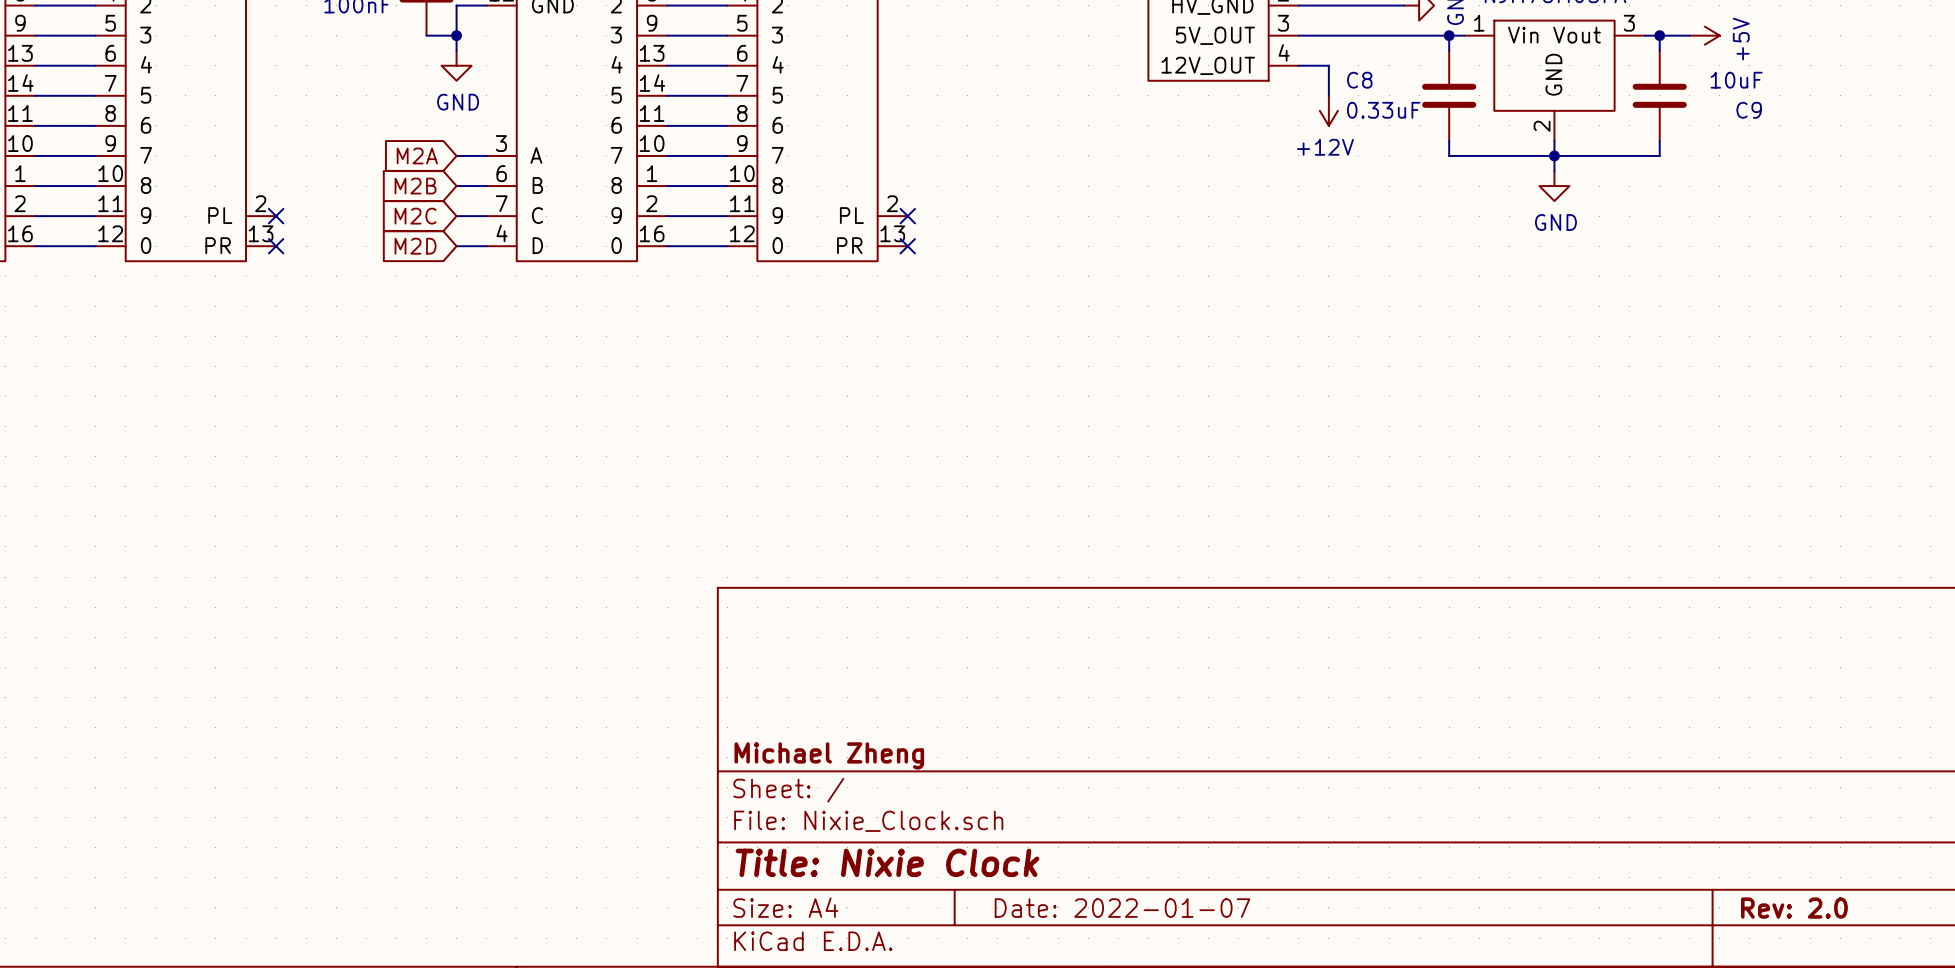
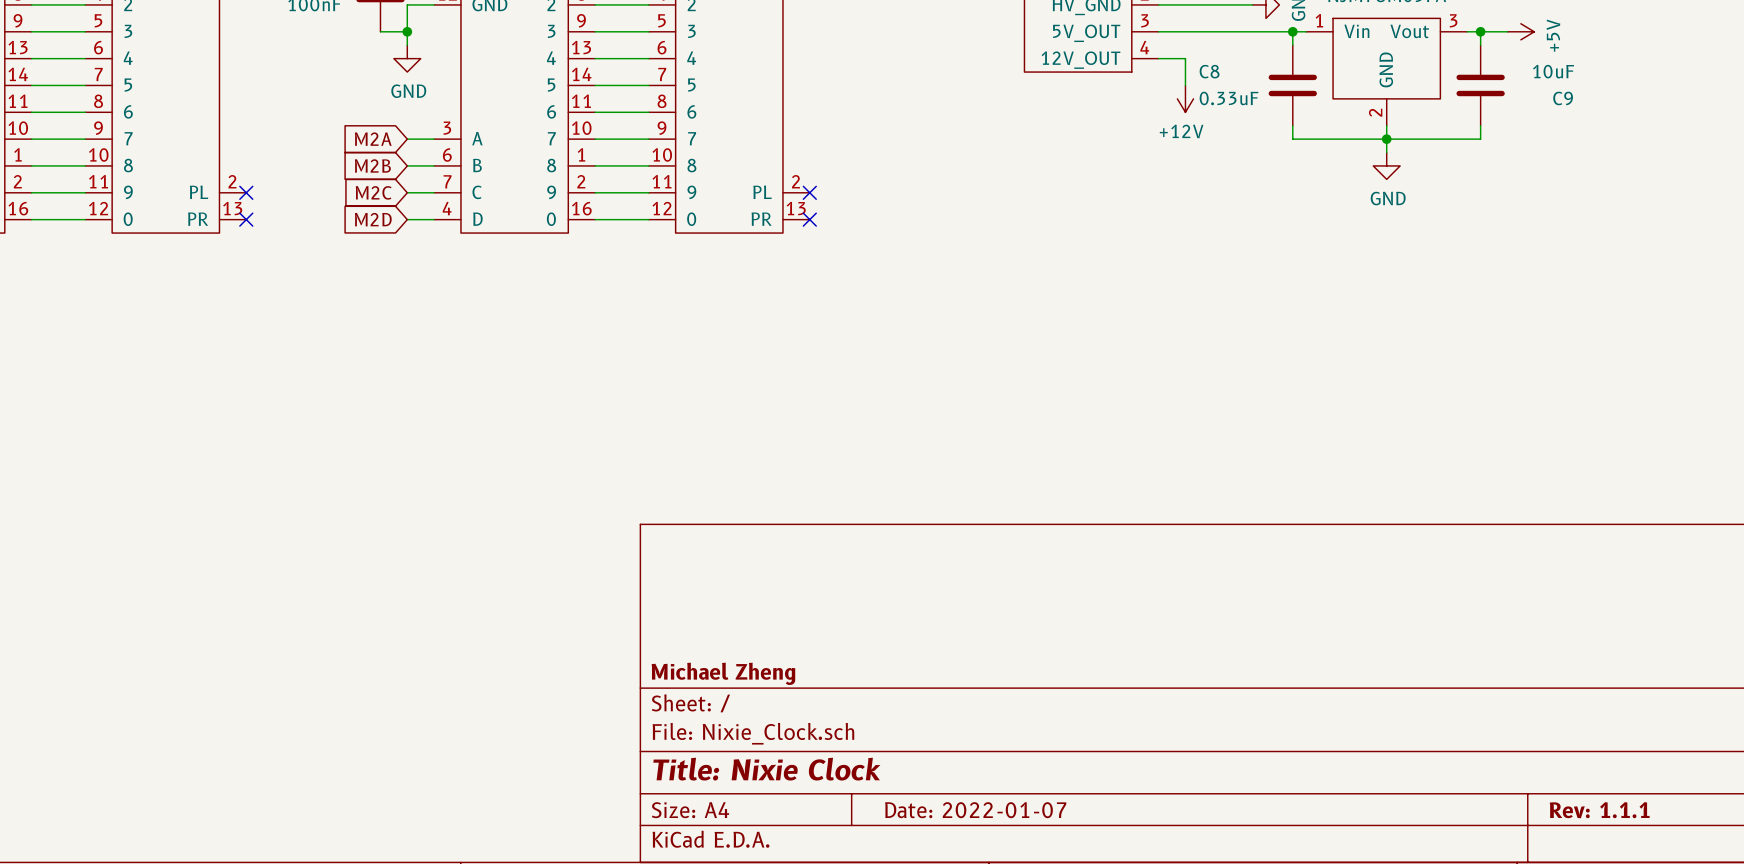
title block: Rev: 2.0 (1794, 908) -> Rev: 1.1.1 (1599, 810)

